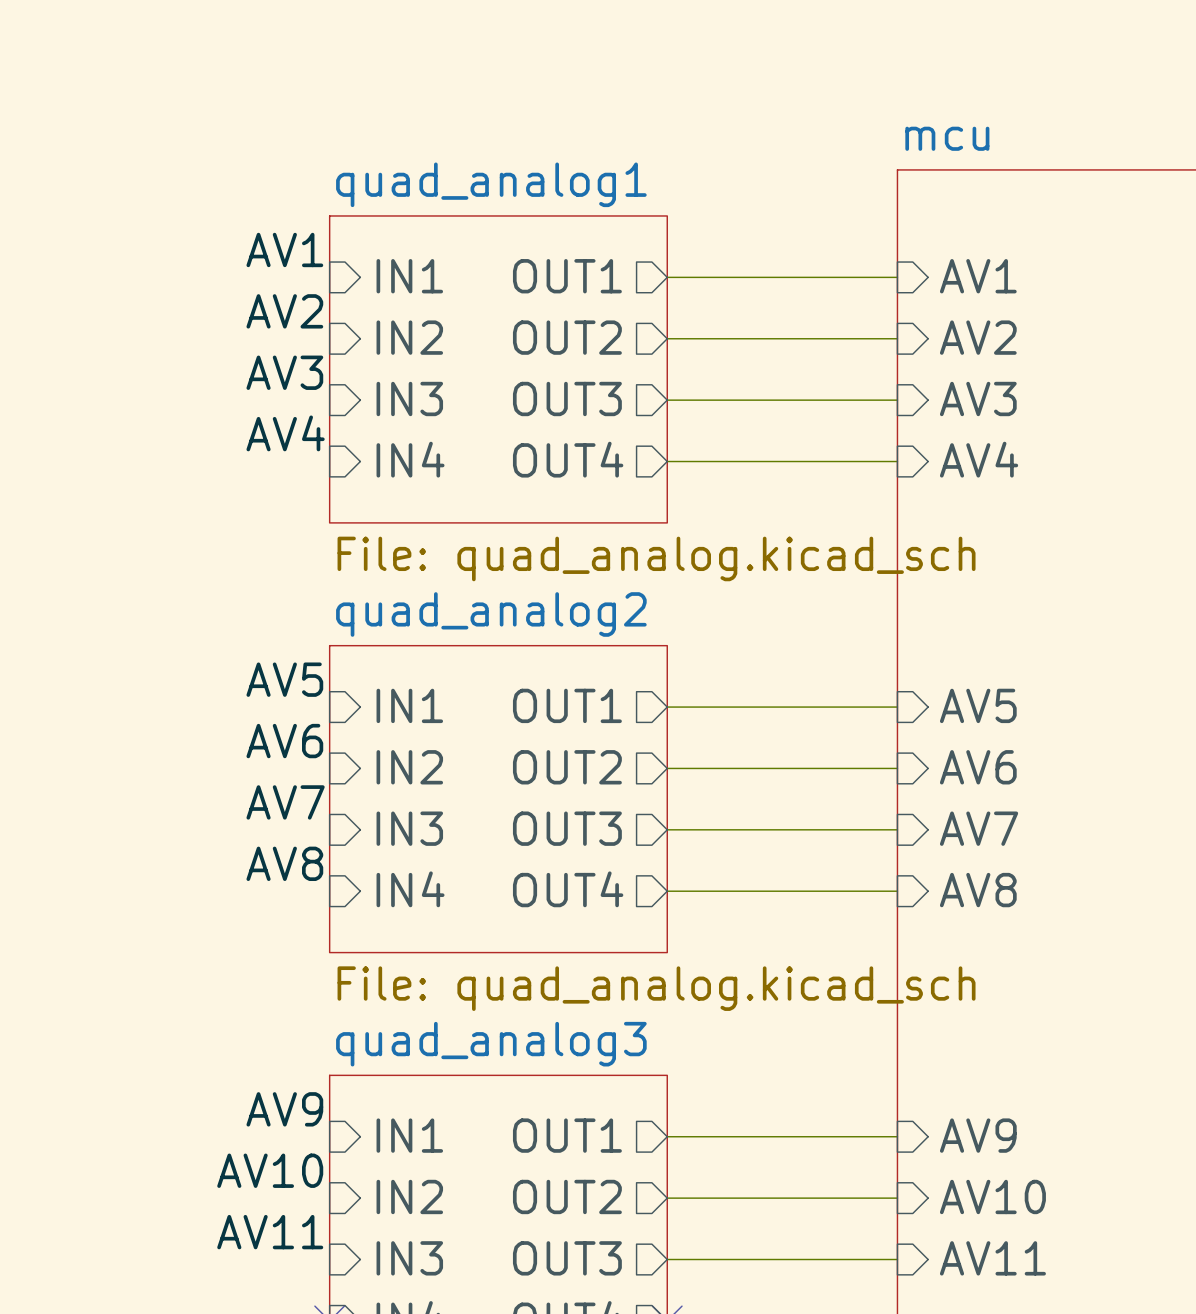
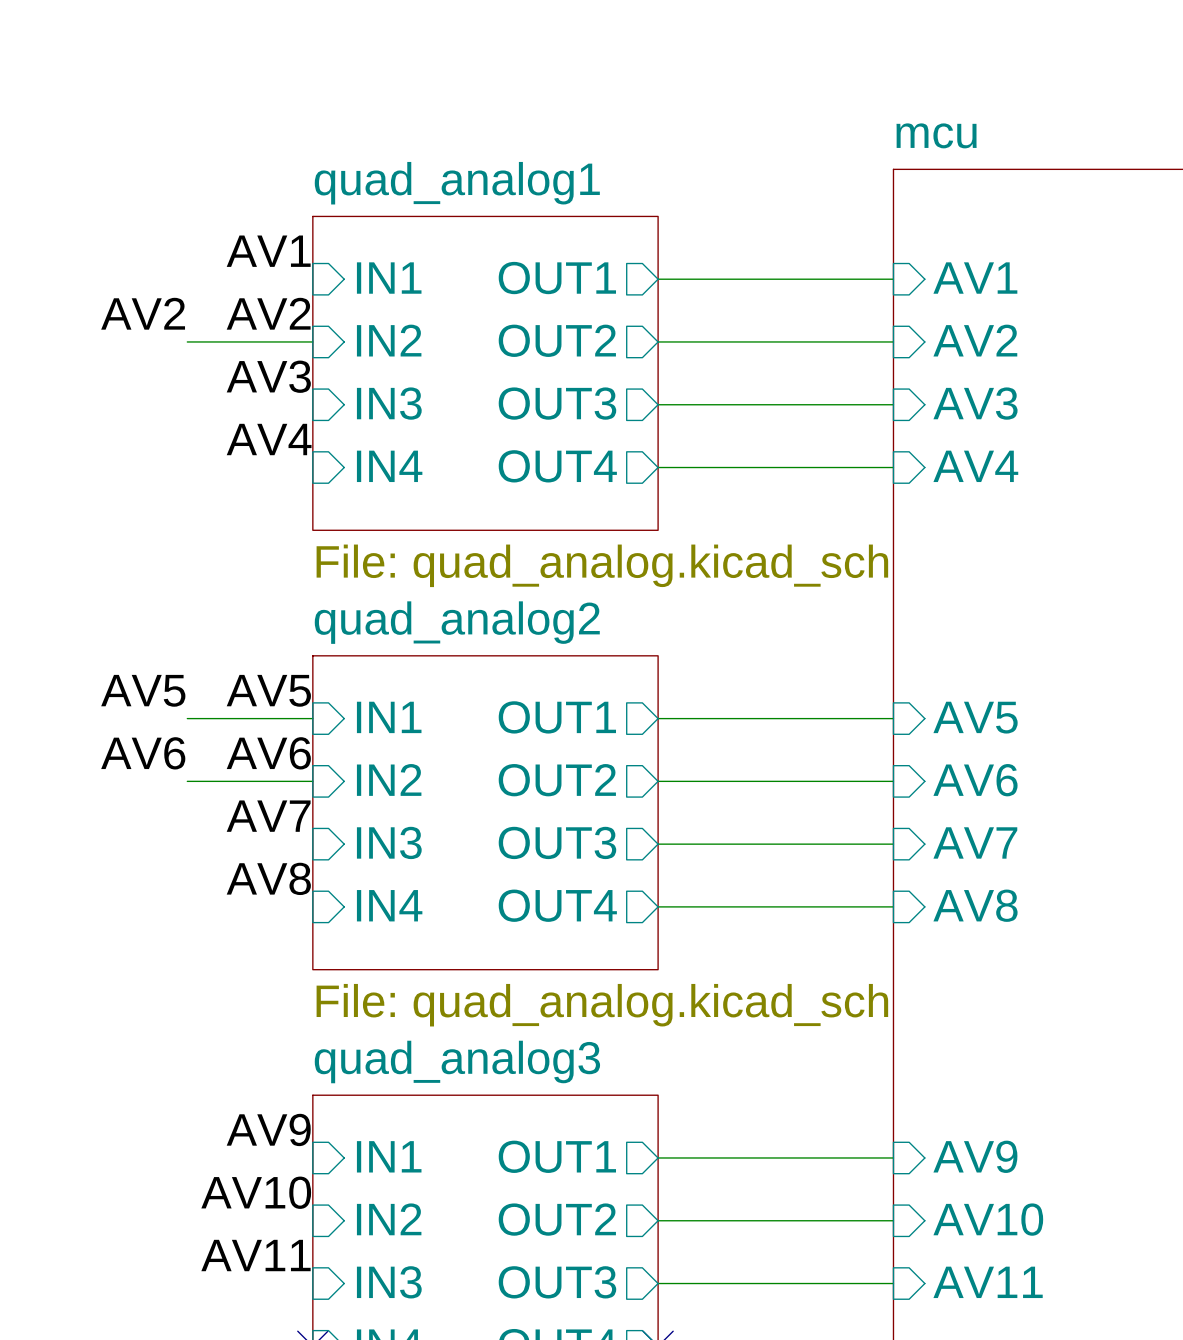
label: none -> AV2 (143, 313)
wire: none -> (187, 341) (312, 341)
label: none -> AV5 (143, 690)
wire: none -> (187, 718) (312, 718)
label: none -> AV6 (143, 753)
wire: none -> (187, 781) (312, 781)

